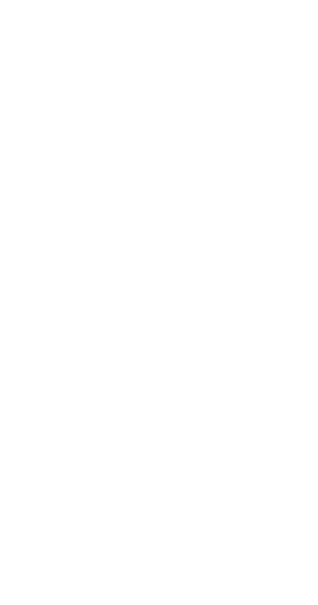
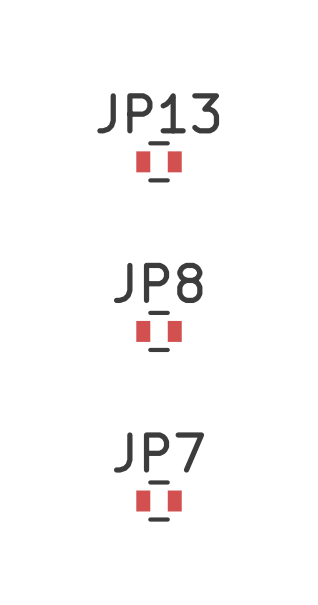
JP13: none -> (159, 161)
JP8: none -> (159, 331)
JP7: none -> (159, 501)

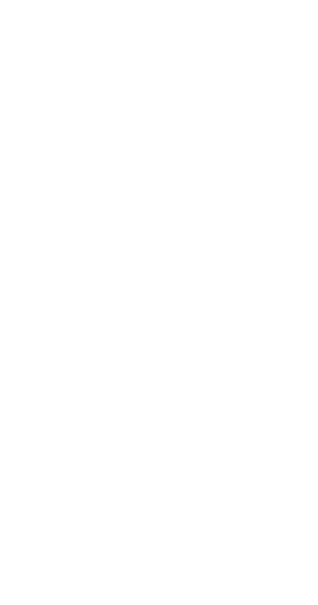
JP13: (159, 161) -> none
JP8: (159, 331) -> none
JP7: (159, 501) -> none

